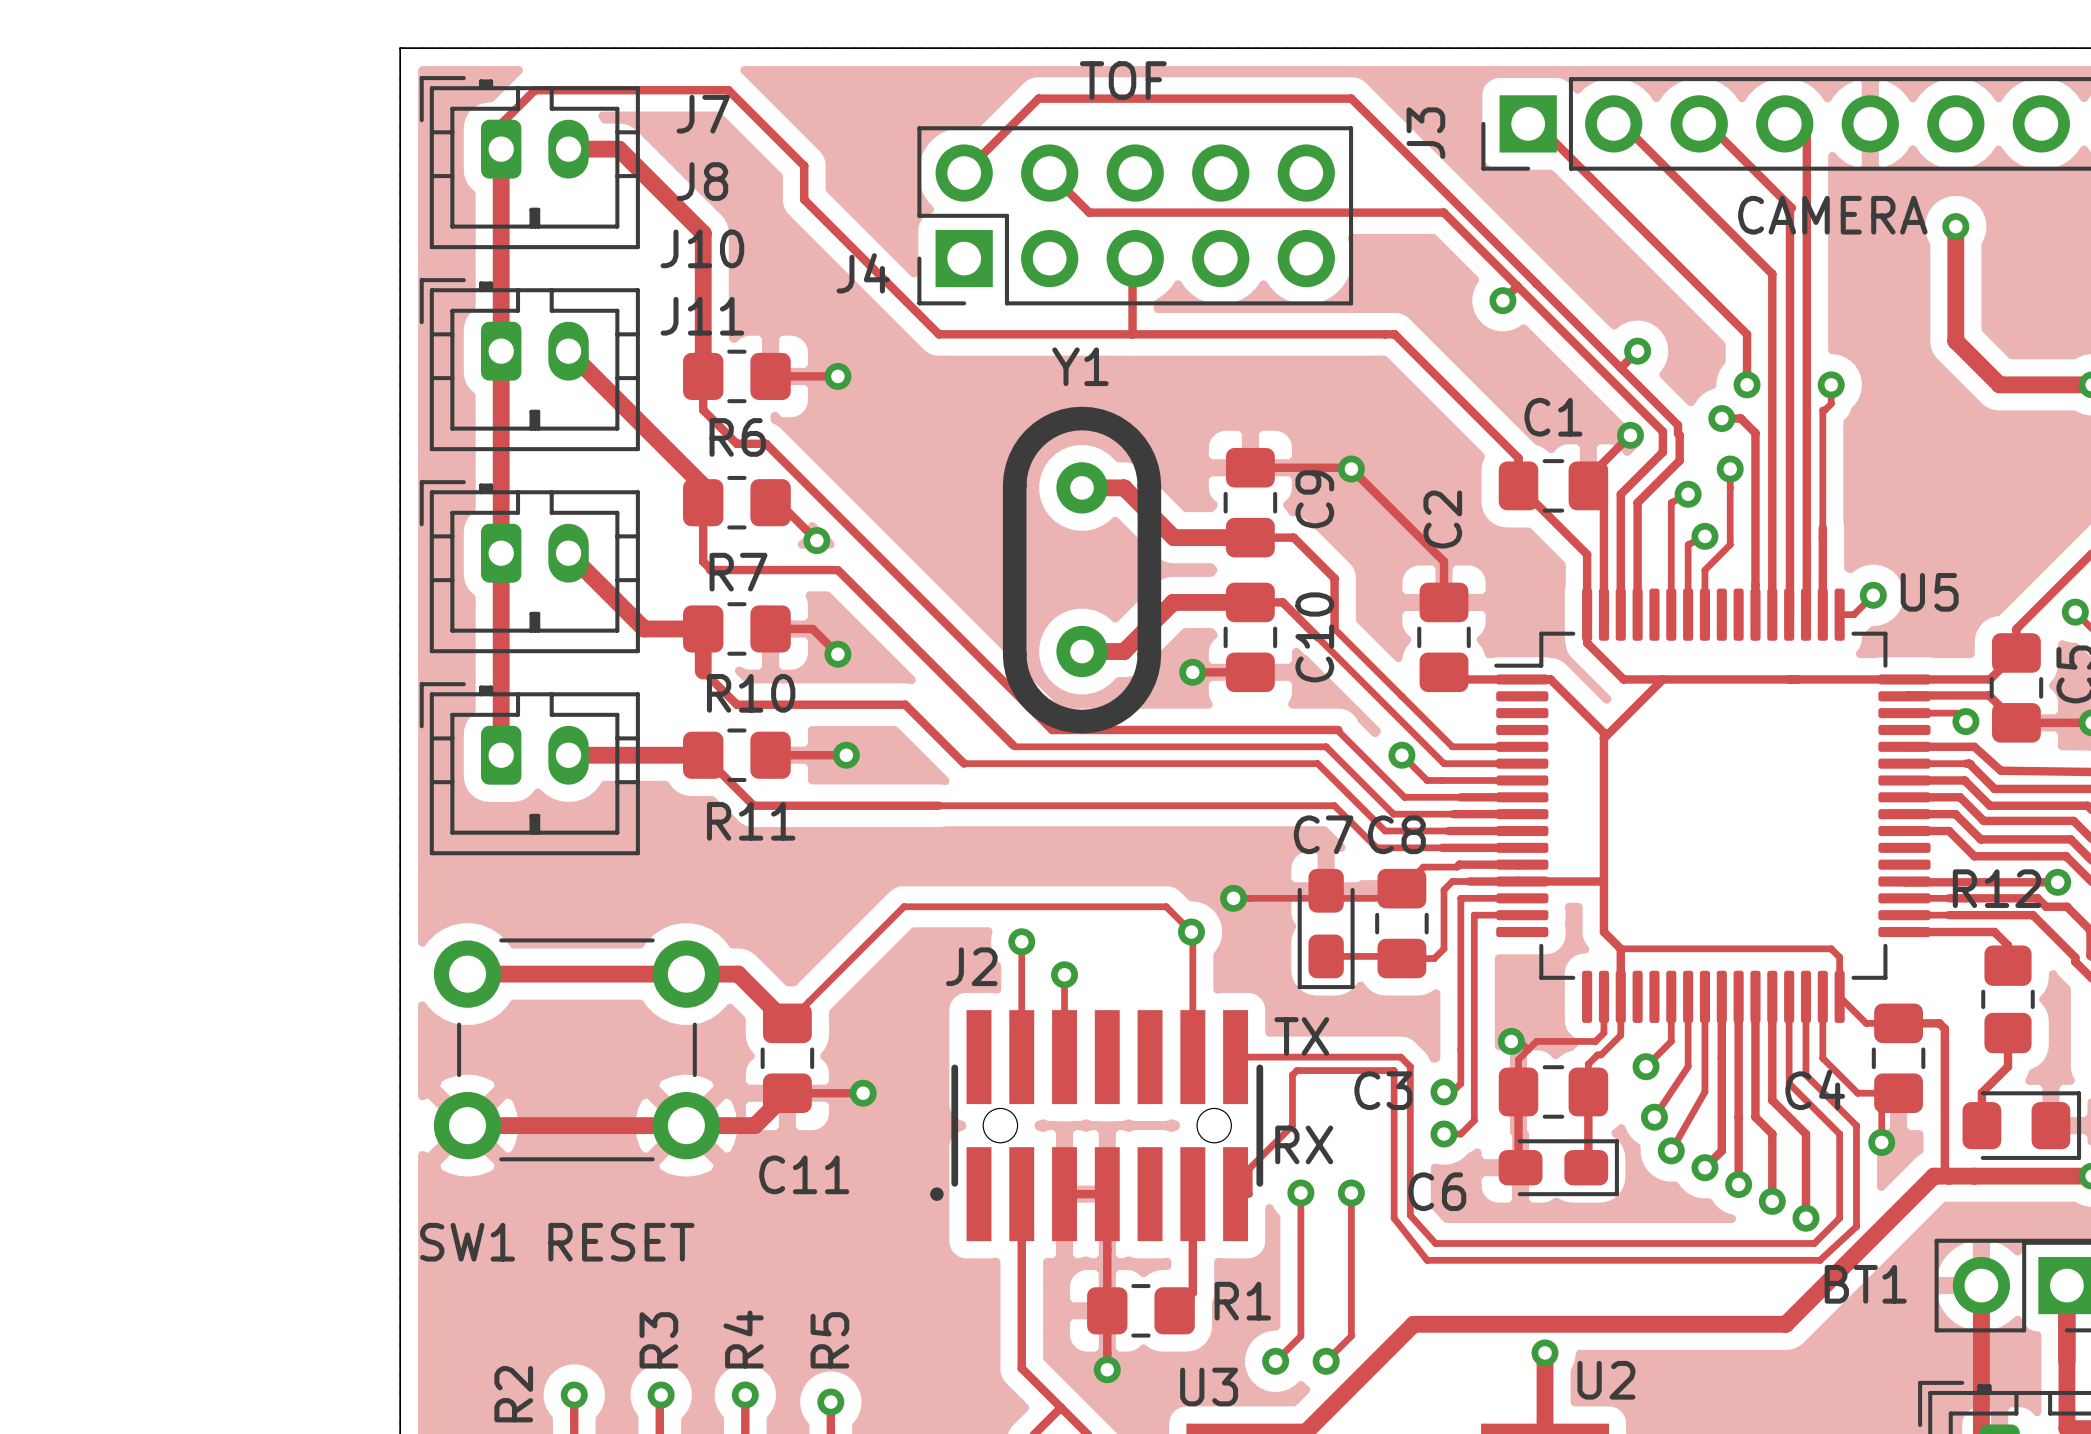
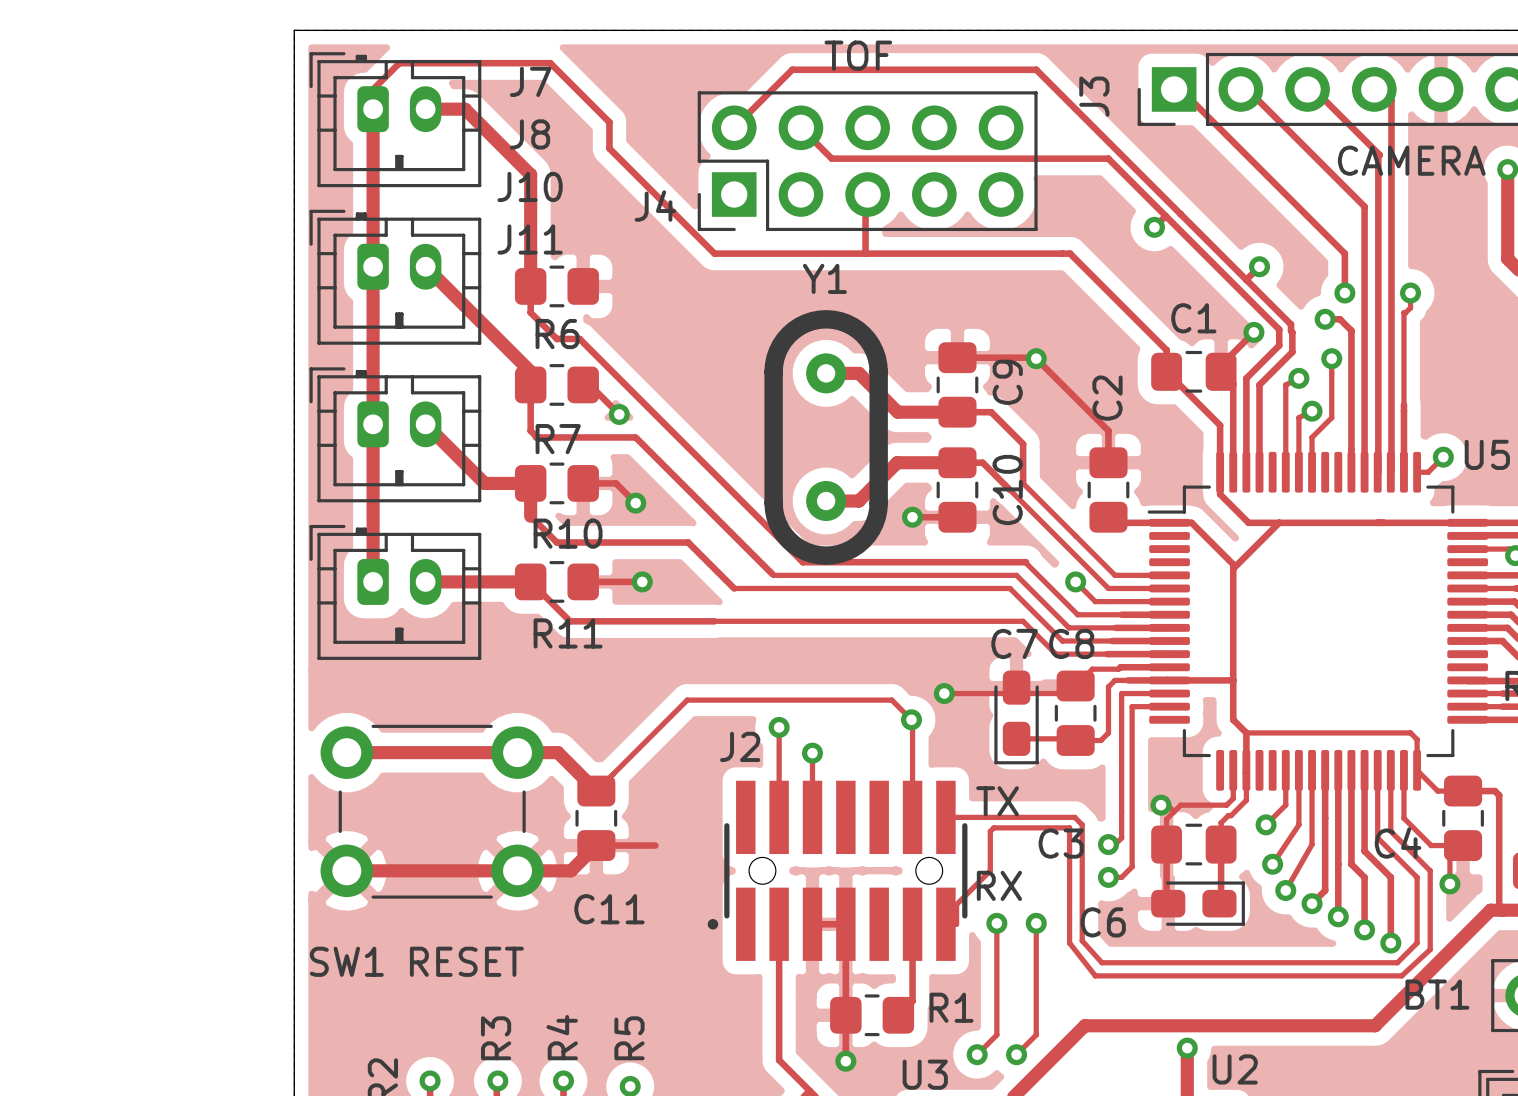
track: (770, 376) (837, 376) -> none
via: (837, 376) -> none
via: (863, 1093) -> none

